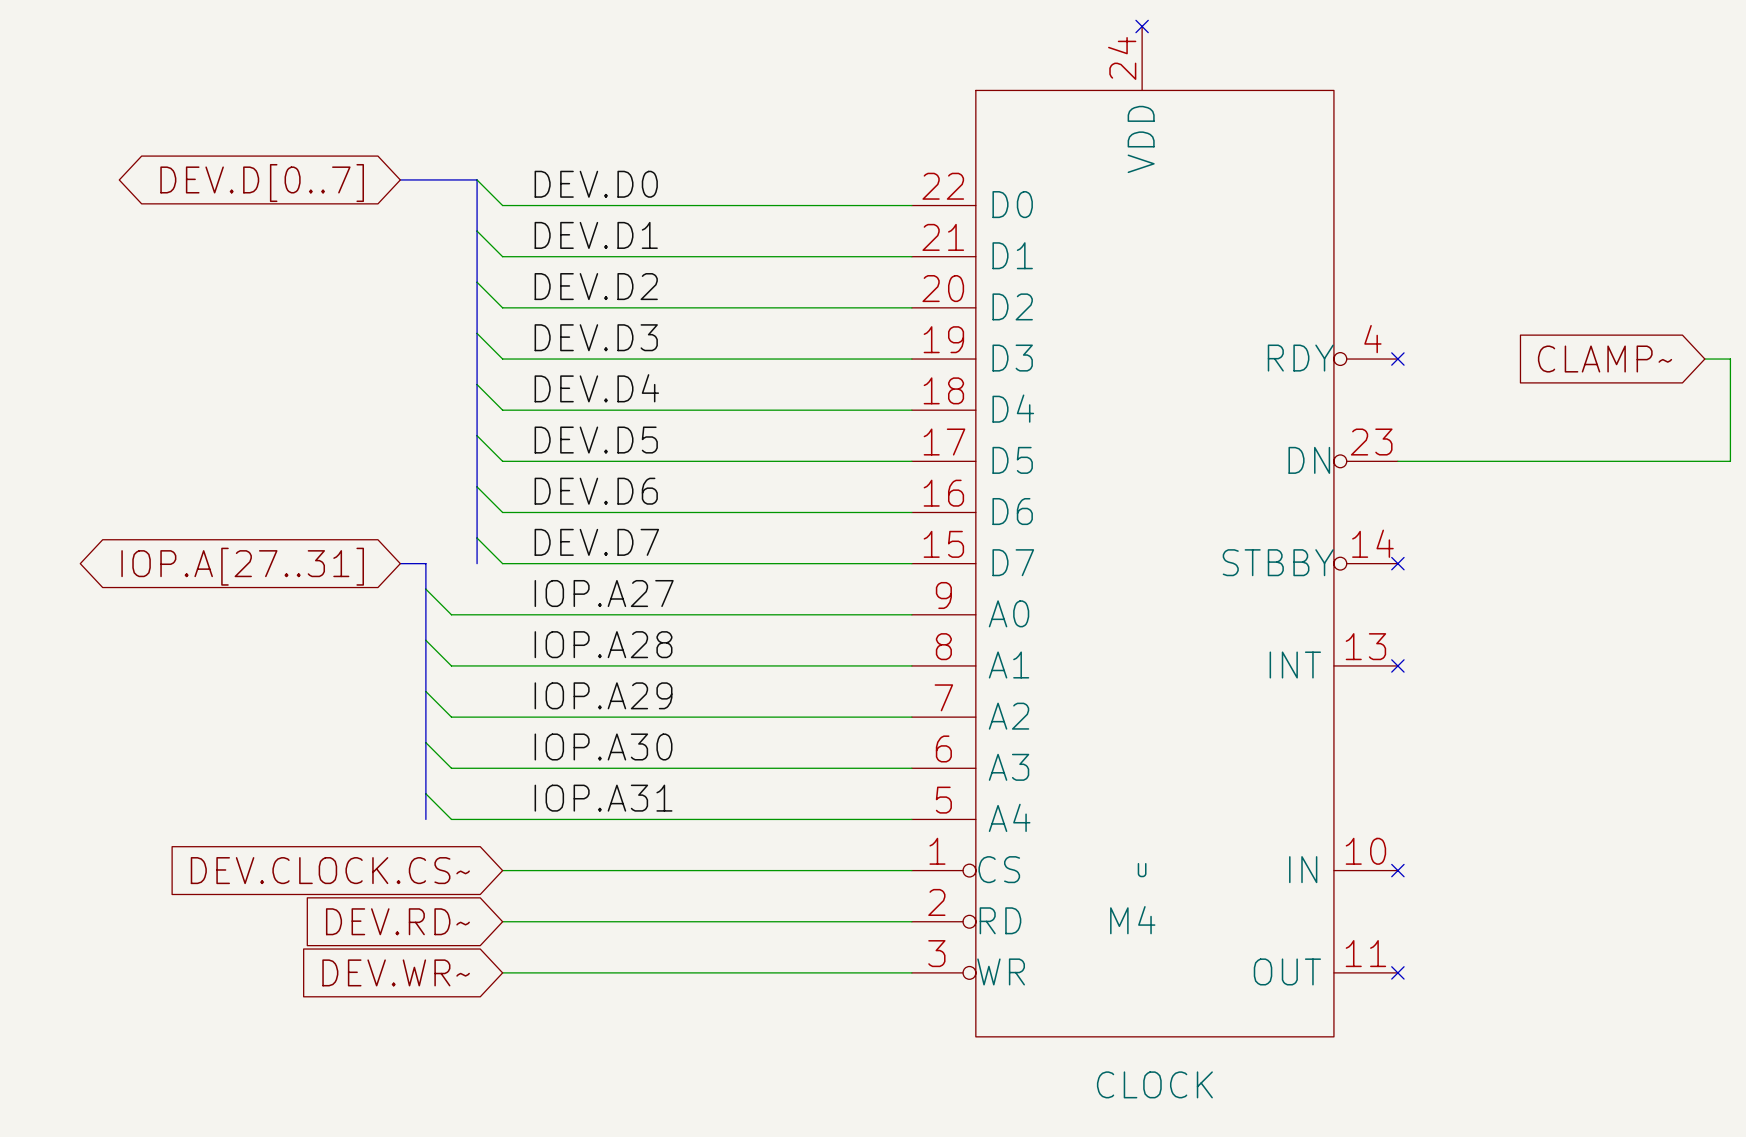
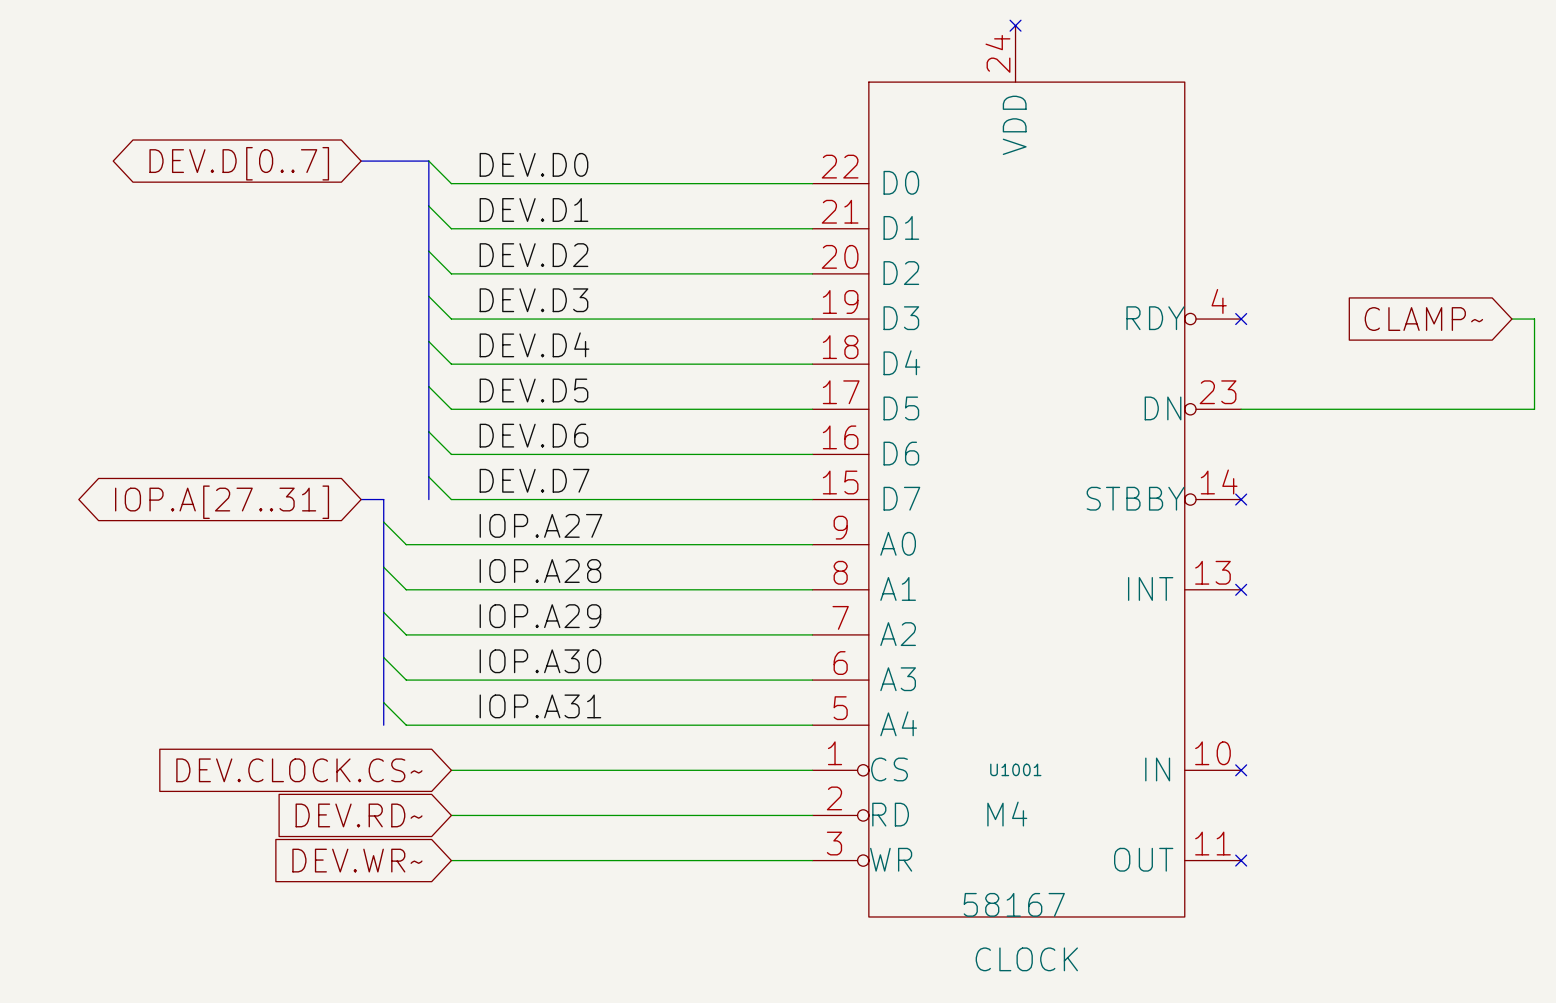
U name: U (1142, 870) -> U1001 (1015, 769)
U value: none -> 58167 (1014, 904)

